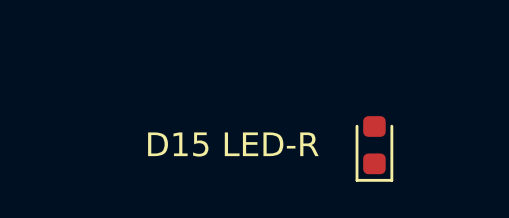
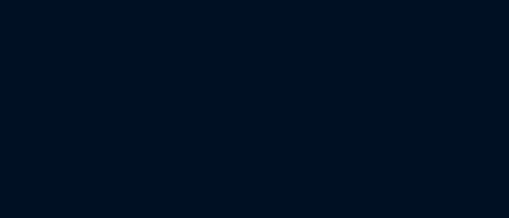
D15 LED-R: (374, 148) -> none

